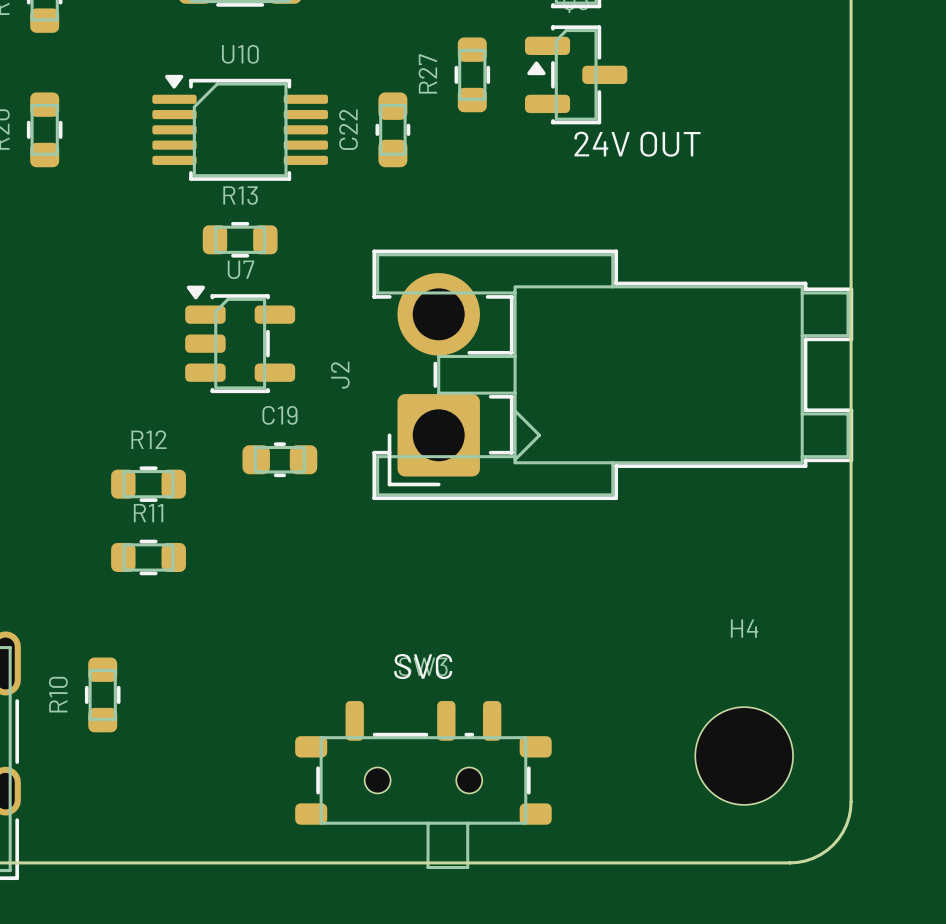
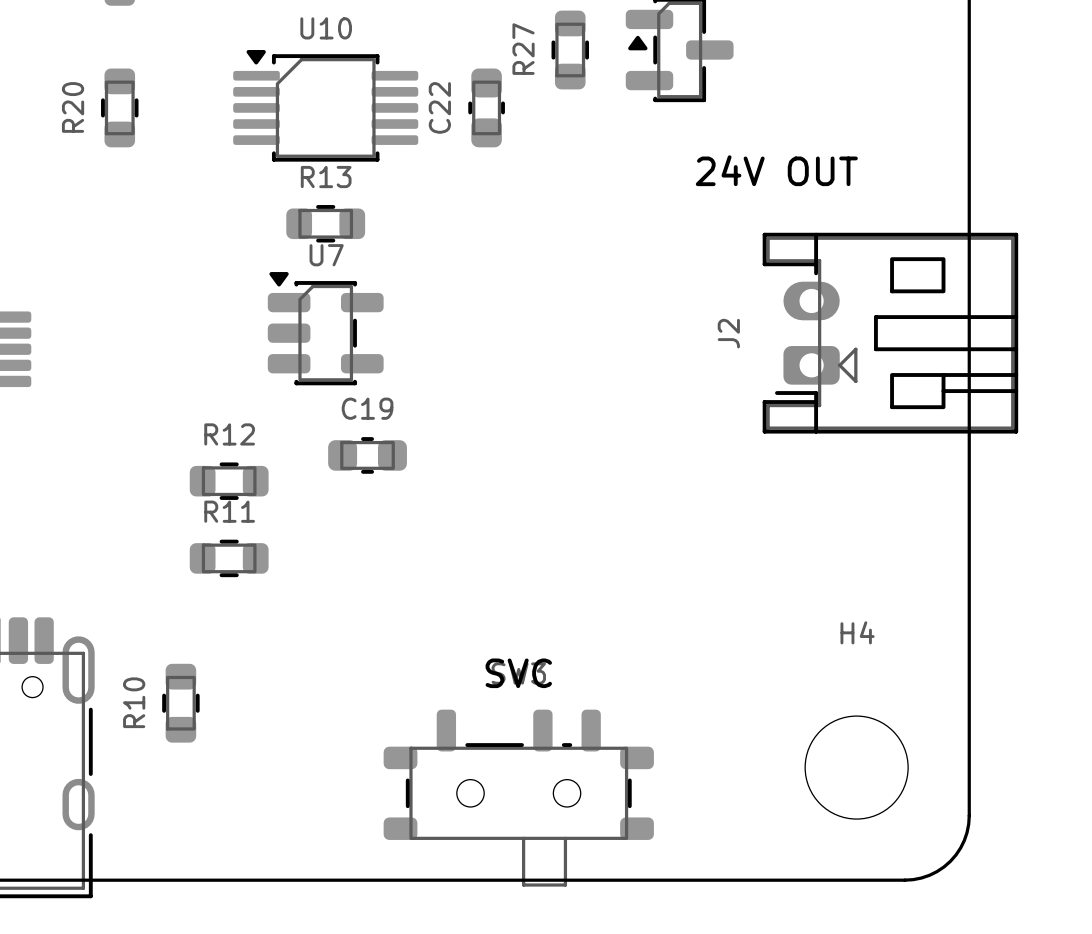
text position: 24V OUT (637, 144) -> 24V OUT (776, 170)
J2 footprint: [372, 249, 854, 501] -> [762, 232, 1019, 434]
J2 name position: J2 (340, 375) -> J2 (728, 333)

